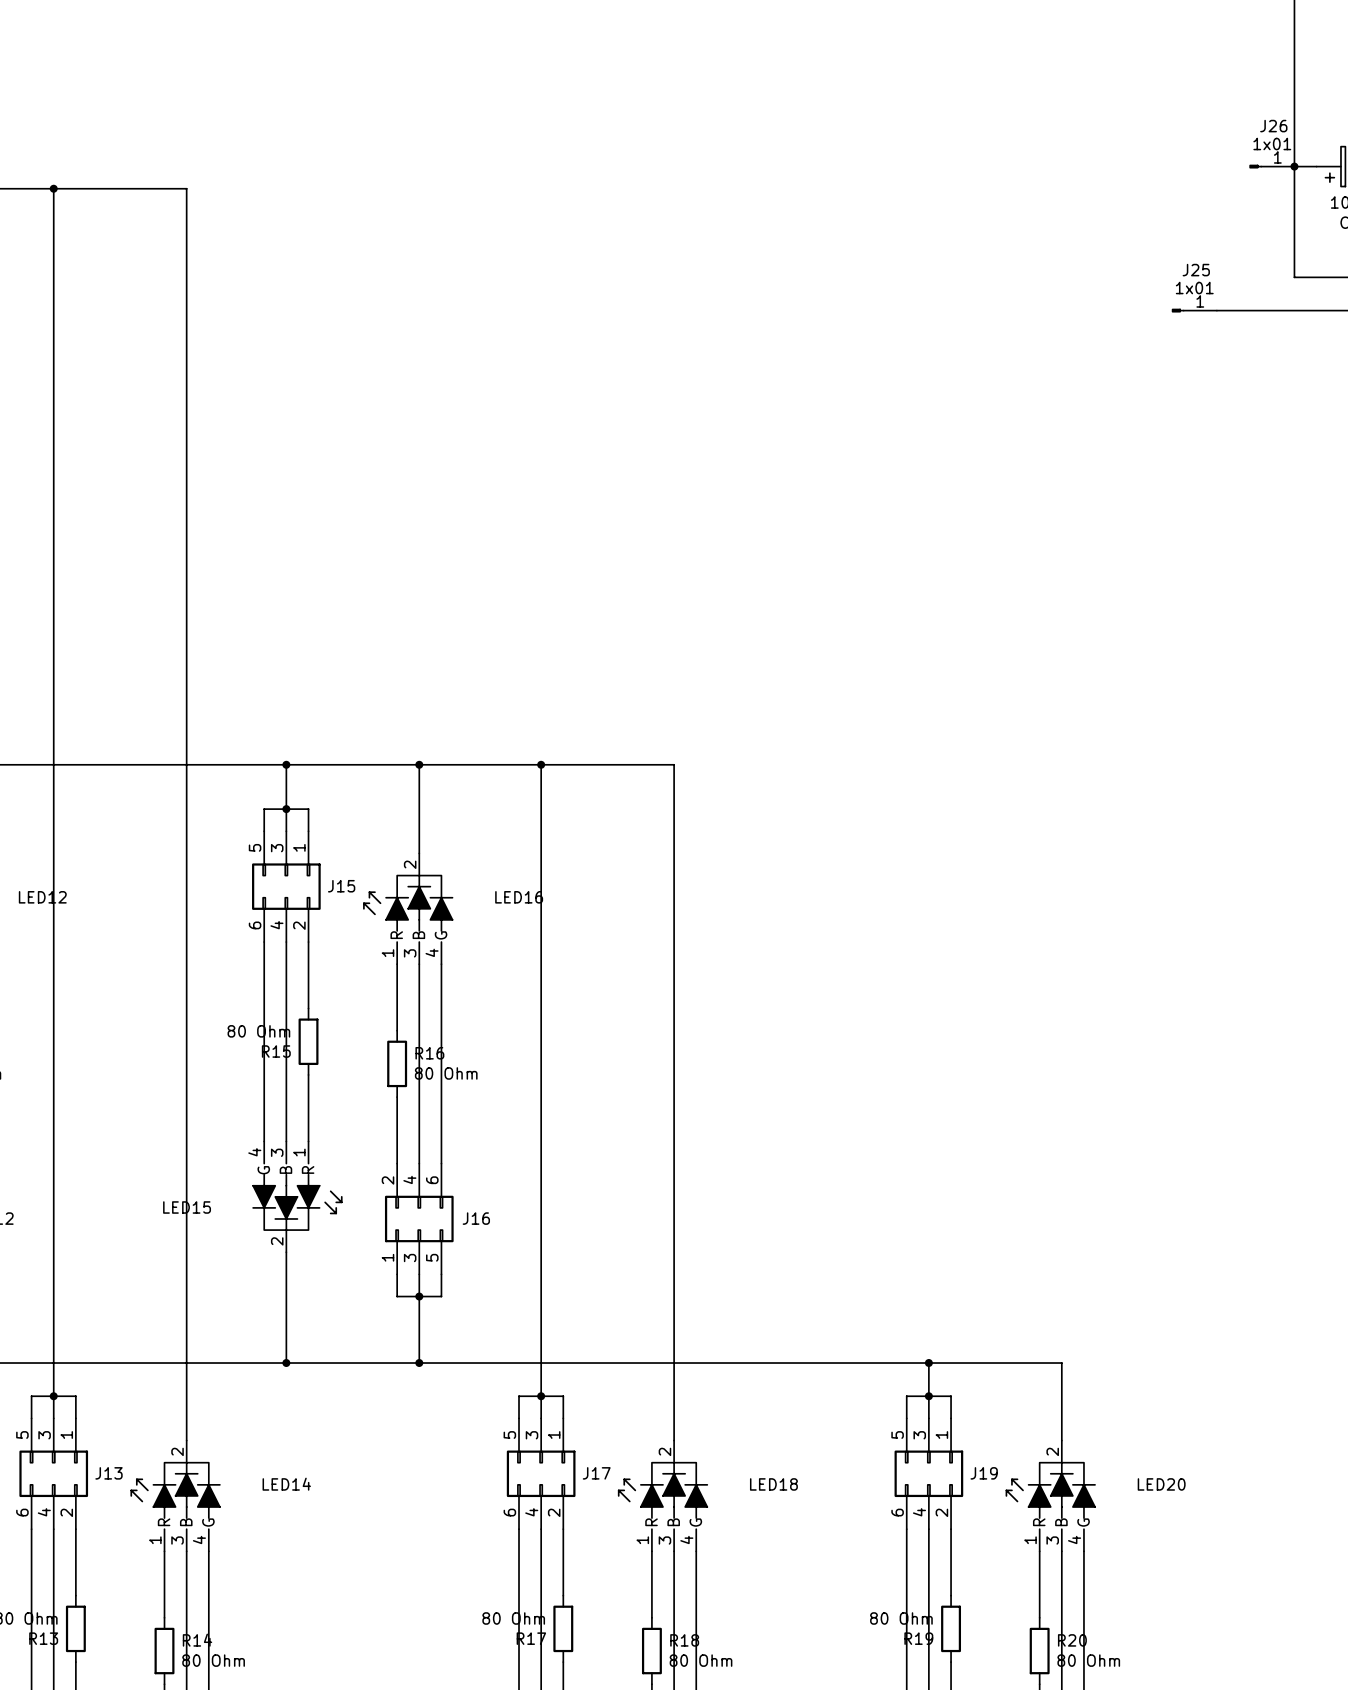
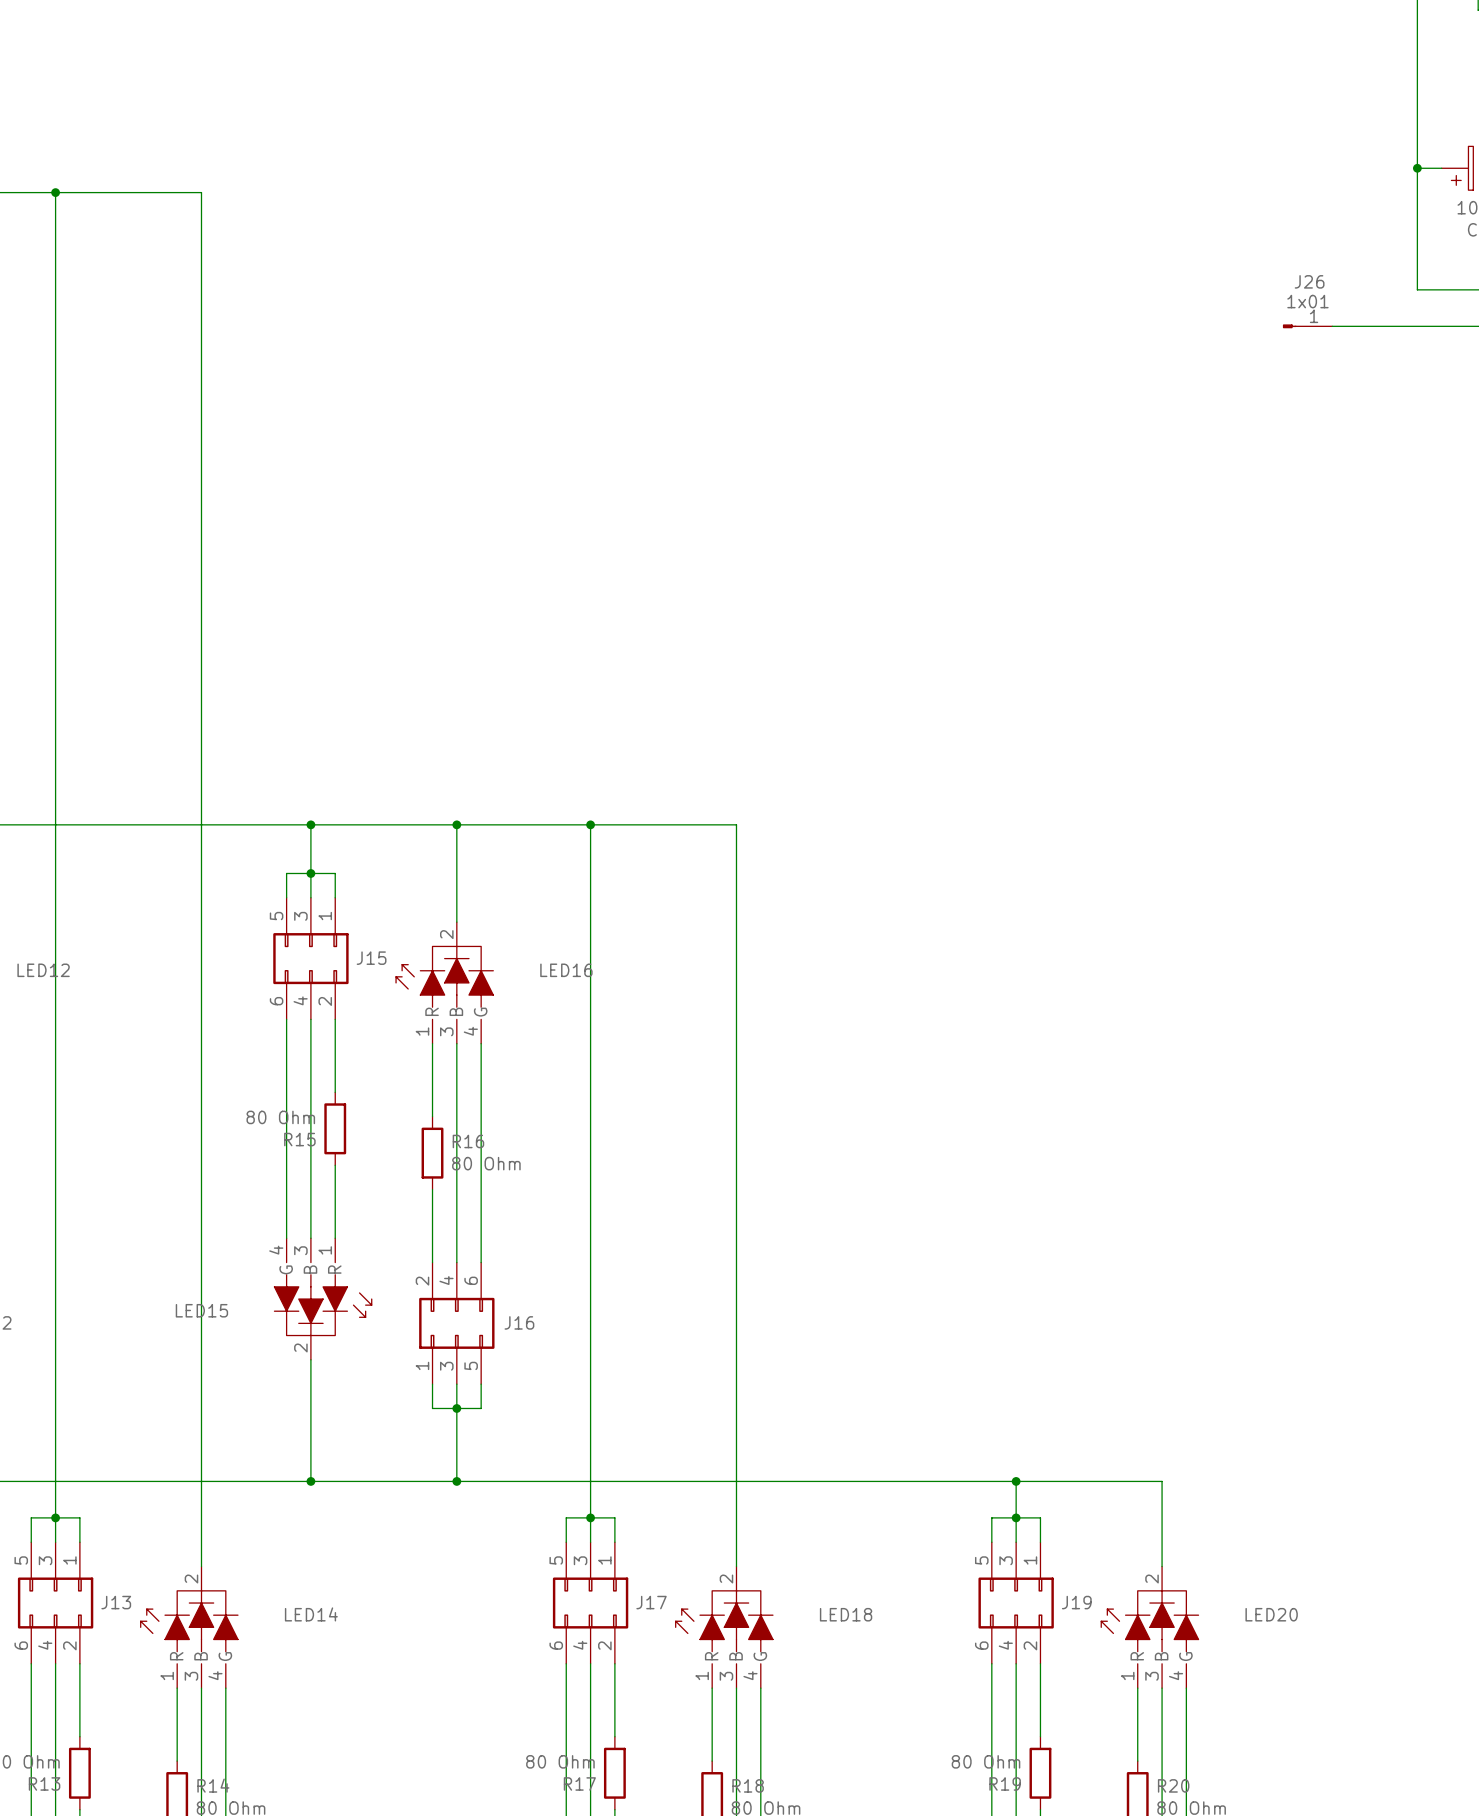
J26: 1x01 (1271, 166) -> none
J25 name: J25 (1196, 270) -> J26 (1309, 281)

